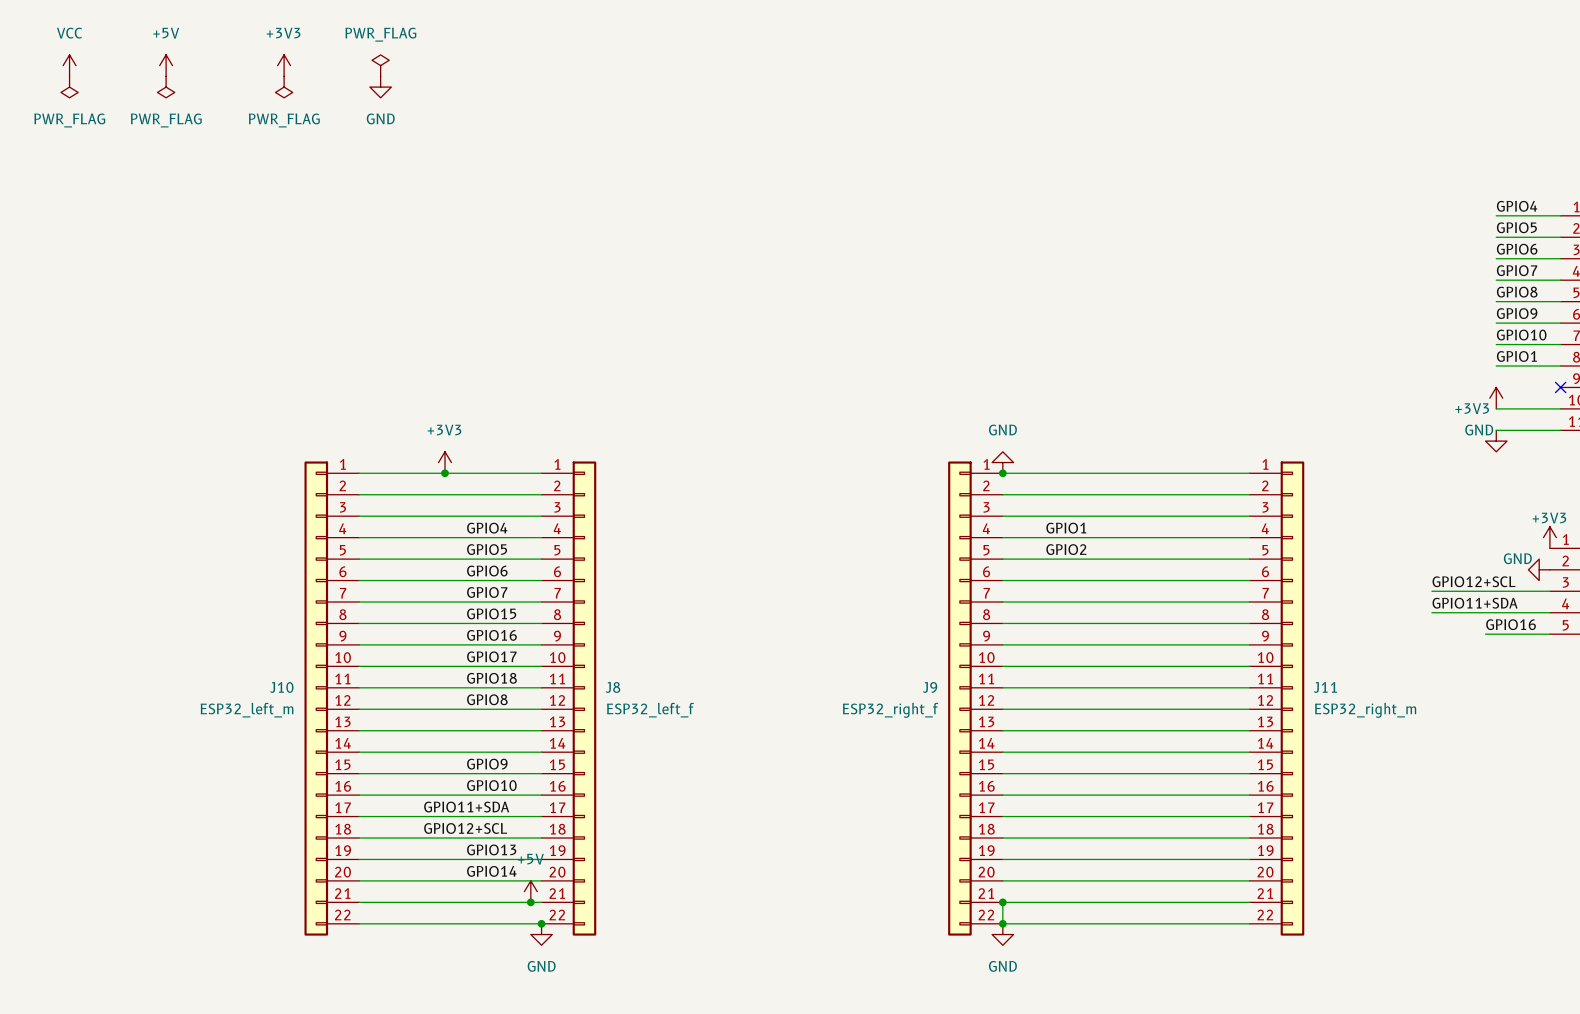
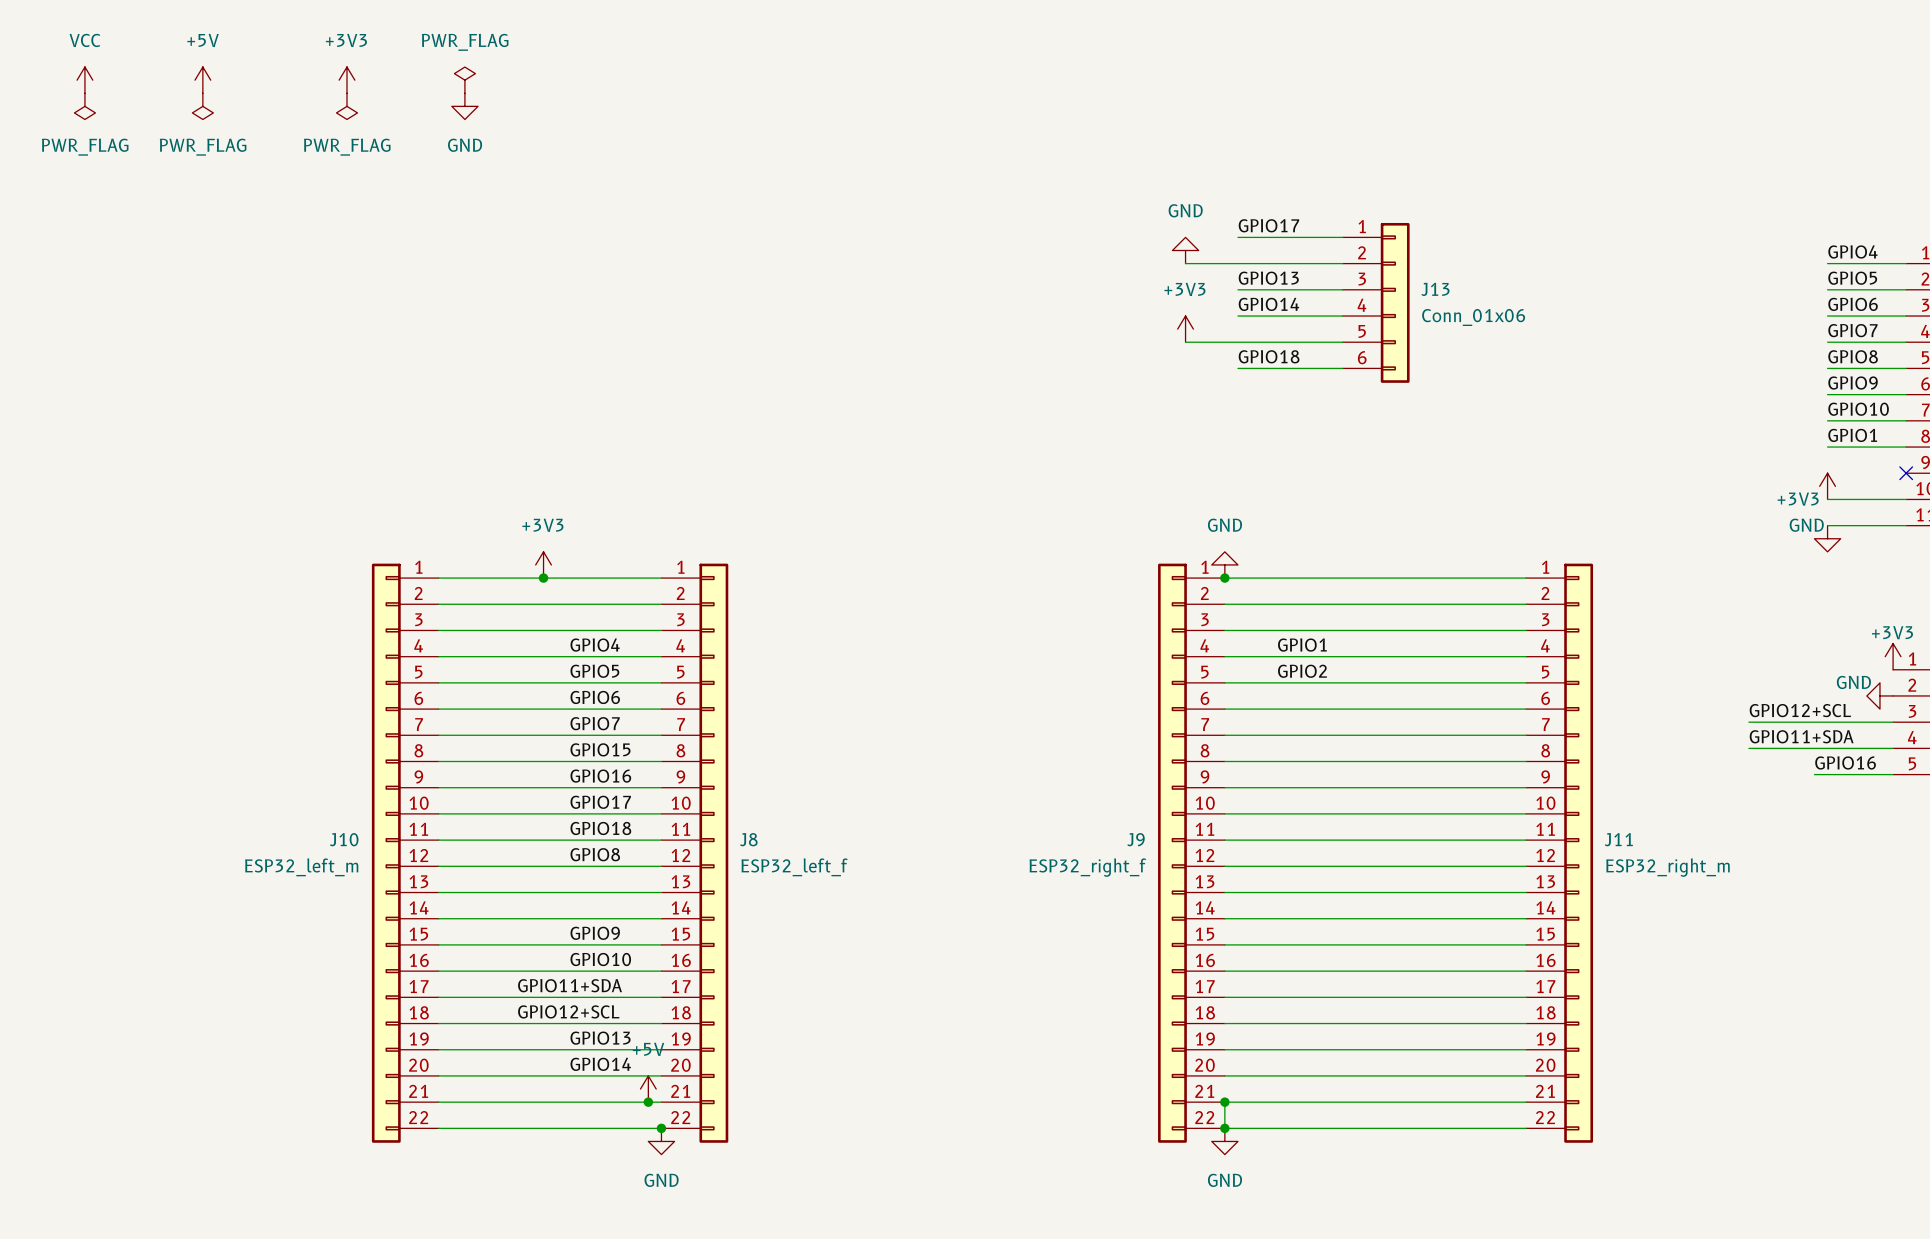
label: none -> GPIO17 (1268, 225)
wire: none -> (1237, 237) (1342, 237)
power symbol: none -> GND (1185, 250)
wire: none -> (1185, 263) (1342, 263)
label: none -> GPIO13 (1268, 278)
wire: none -> (1237, 289) (1342, 289)
J13: none -> Conn_01x06 (1376, 302)
label: none -> GPIO14 (1268, 304)
wire: none -> (1237, 316) (1342, 316)
power symbol: none -> +3V3 (1185, 329)
wire: none -> (1185, 342) (1342, 342)
label: none -> GPIO18 (1269, 356)
wire: none -> (1237, 368) (1342, 368)

